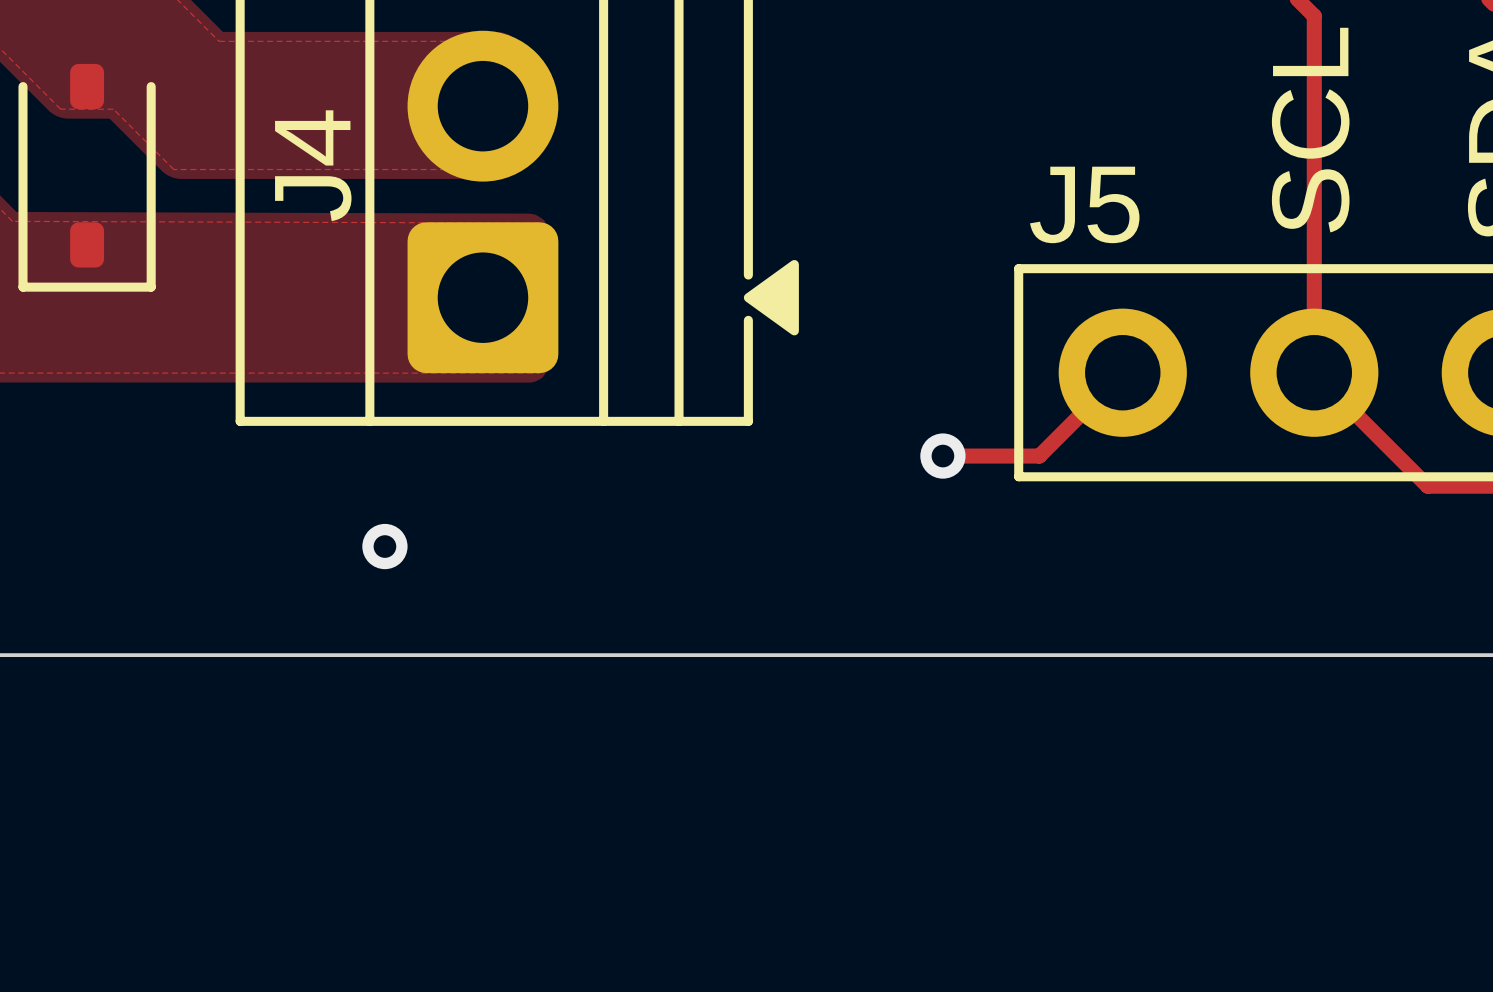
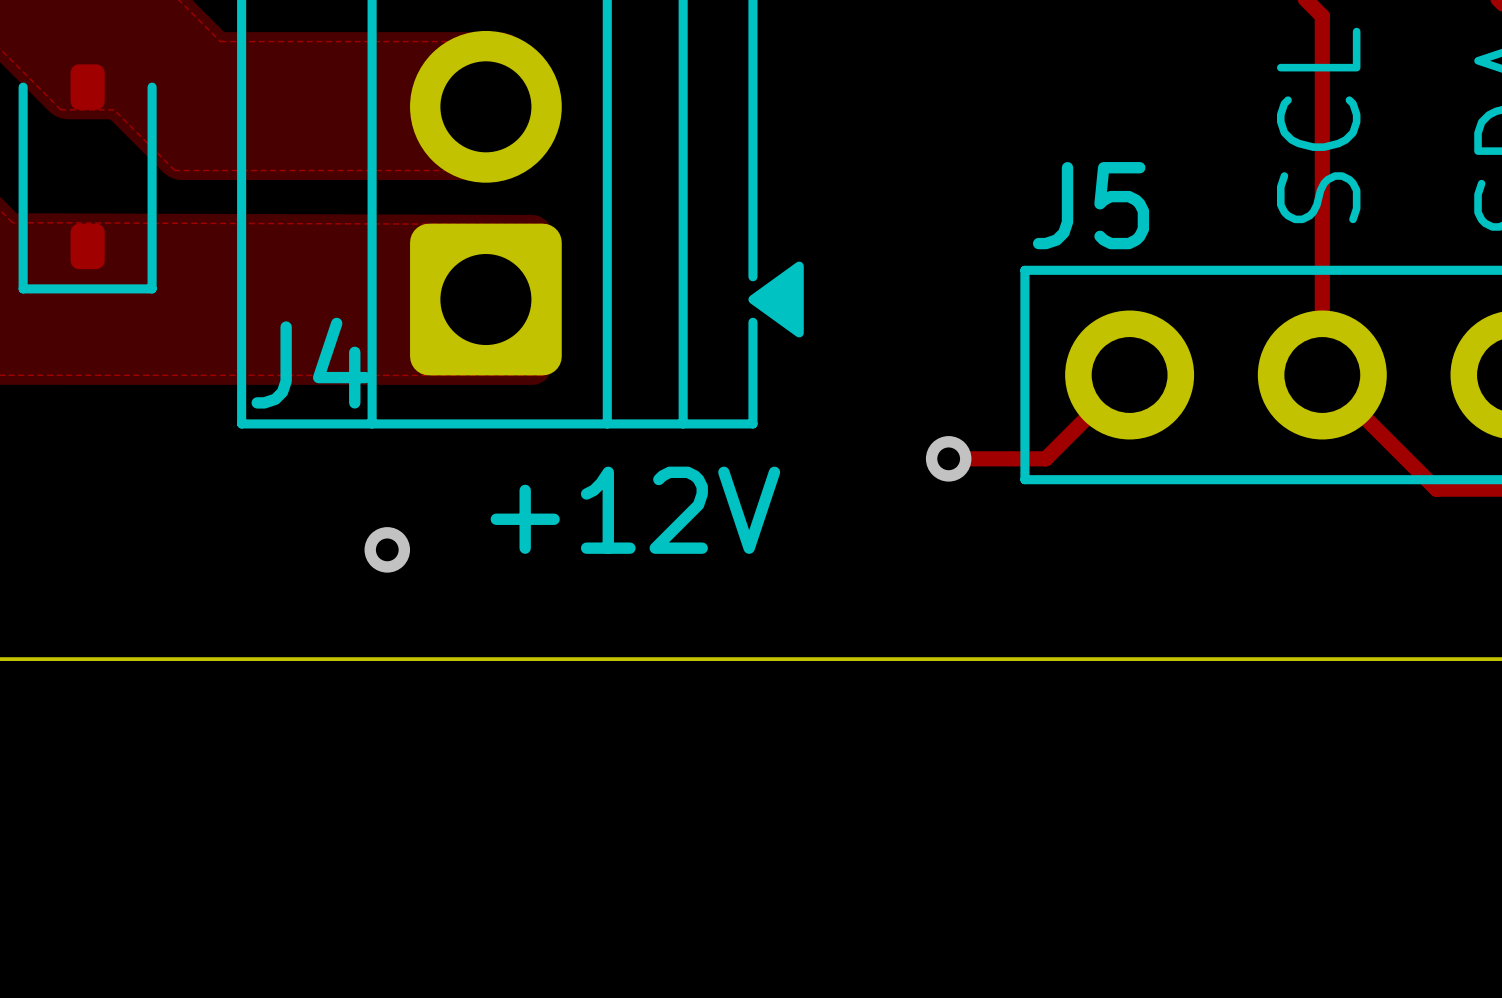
J4 name rotation: 0° (313, 165) -> 90° clockwise (311, 363)
J4 name position: J4 (313, 165) -> J4 (311, 363)
text: none -> +12V (635, 510)

